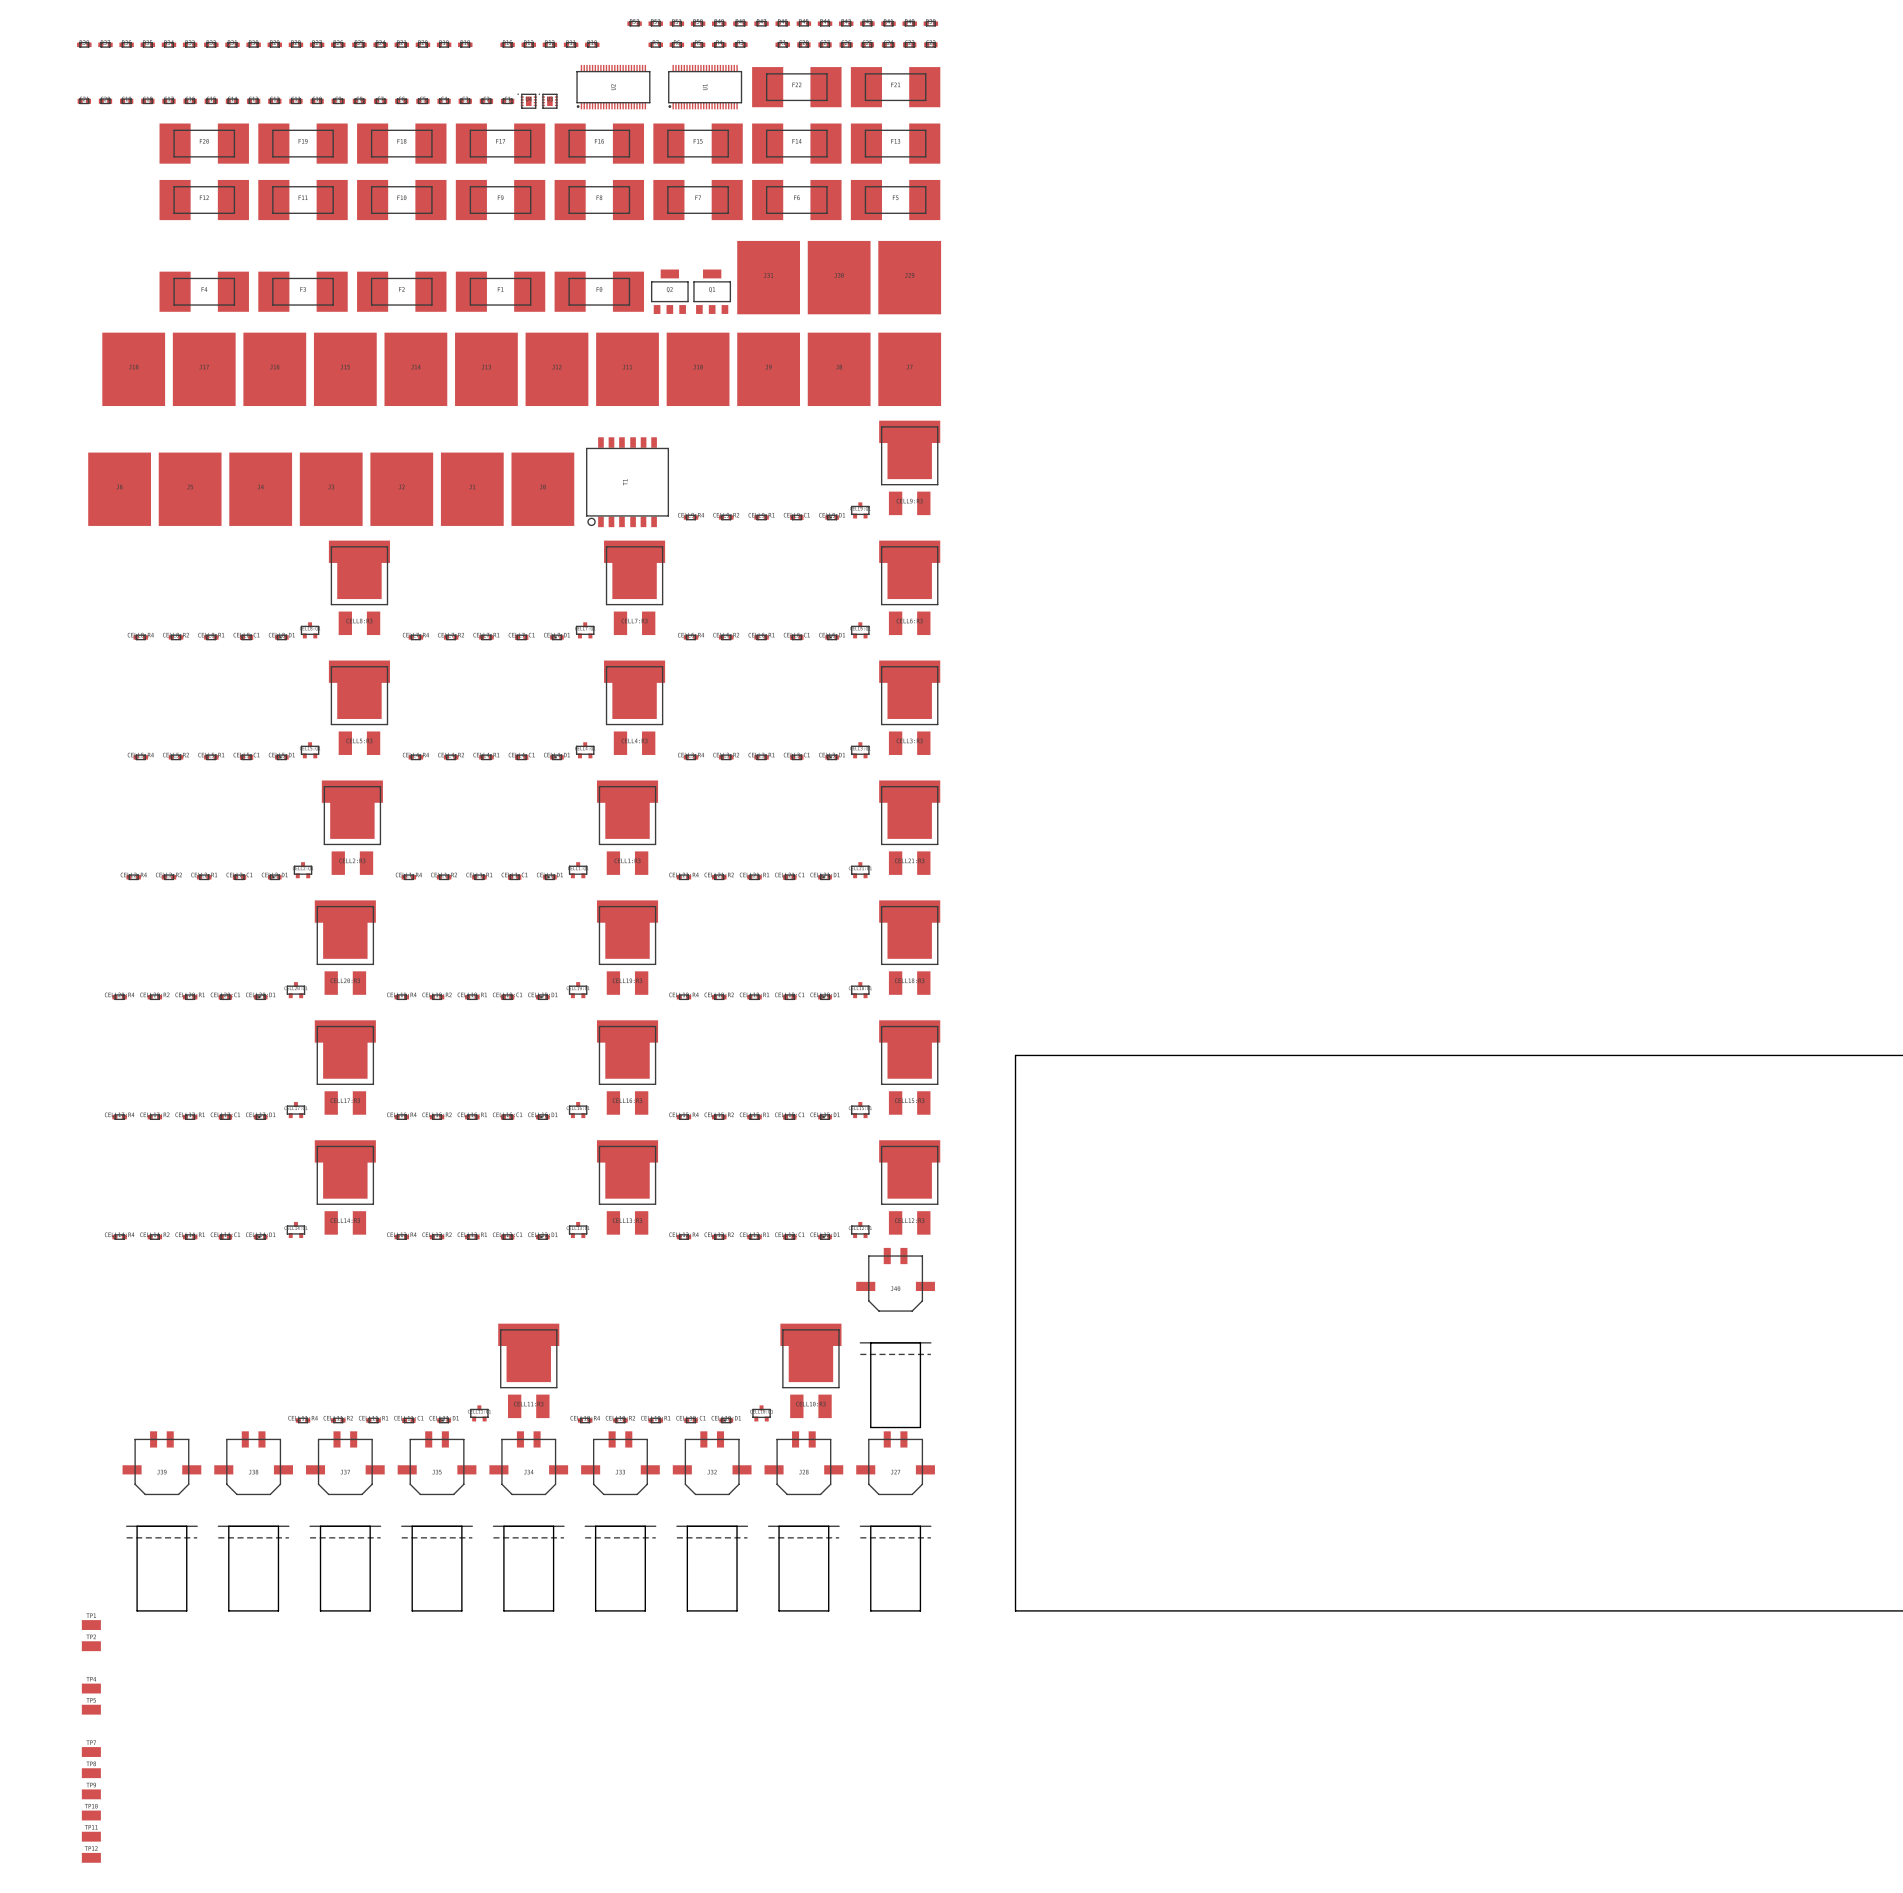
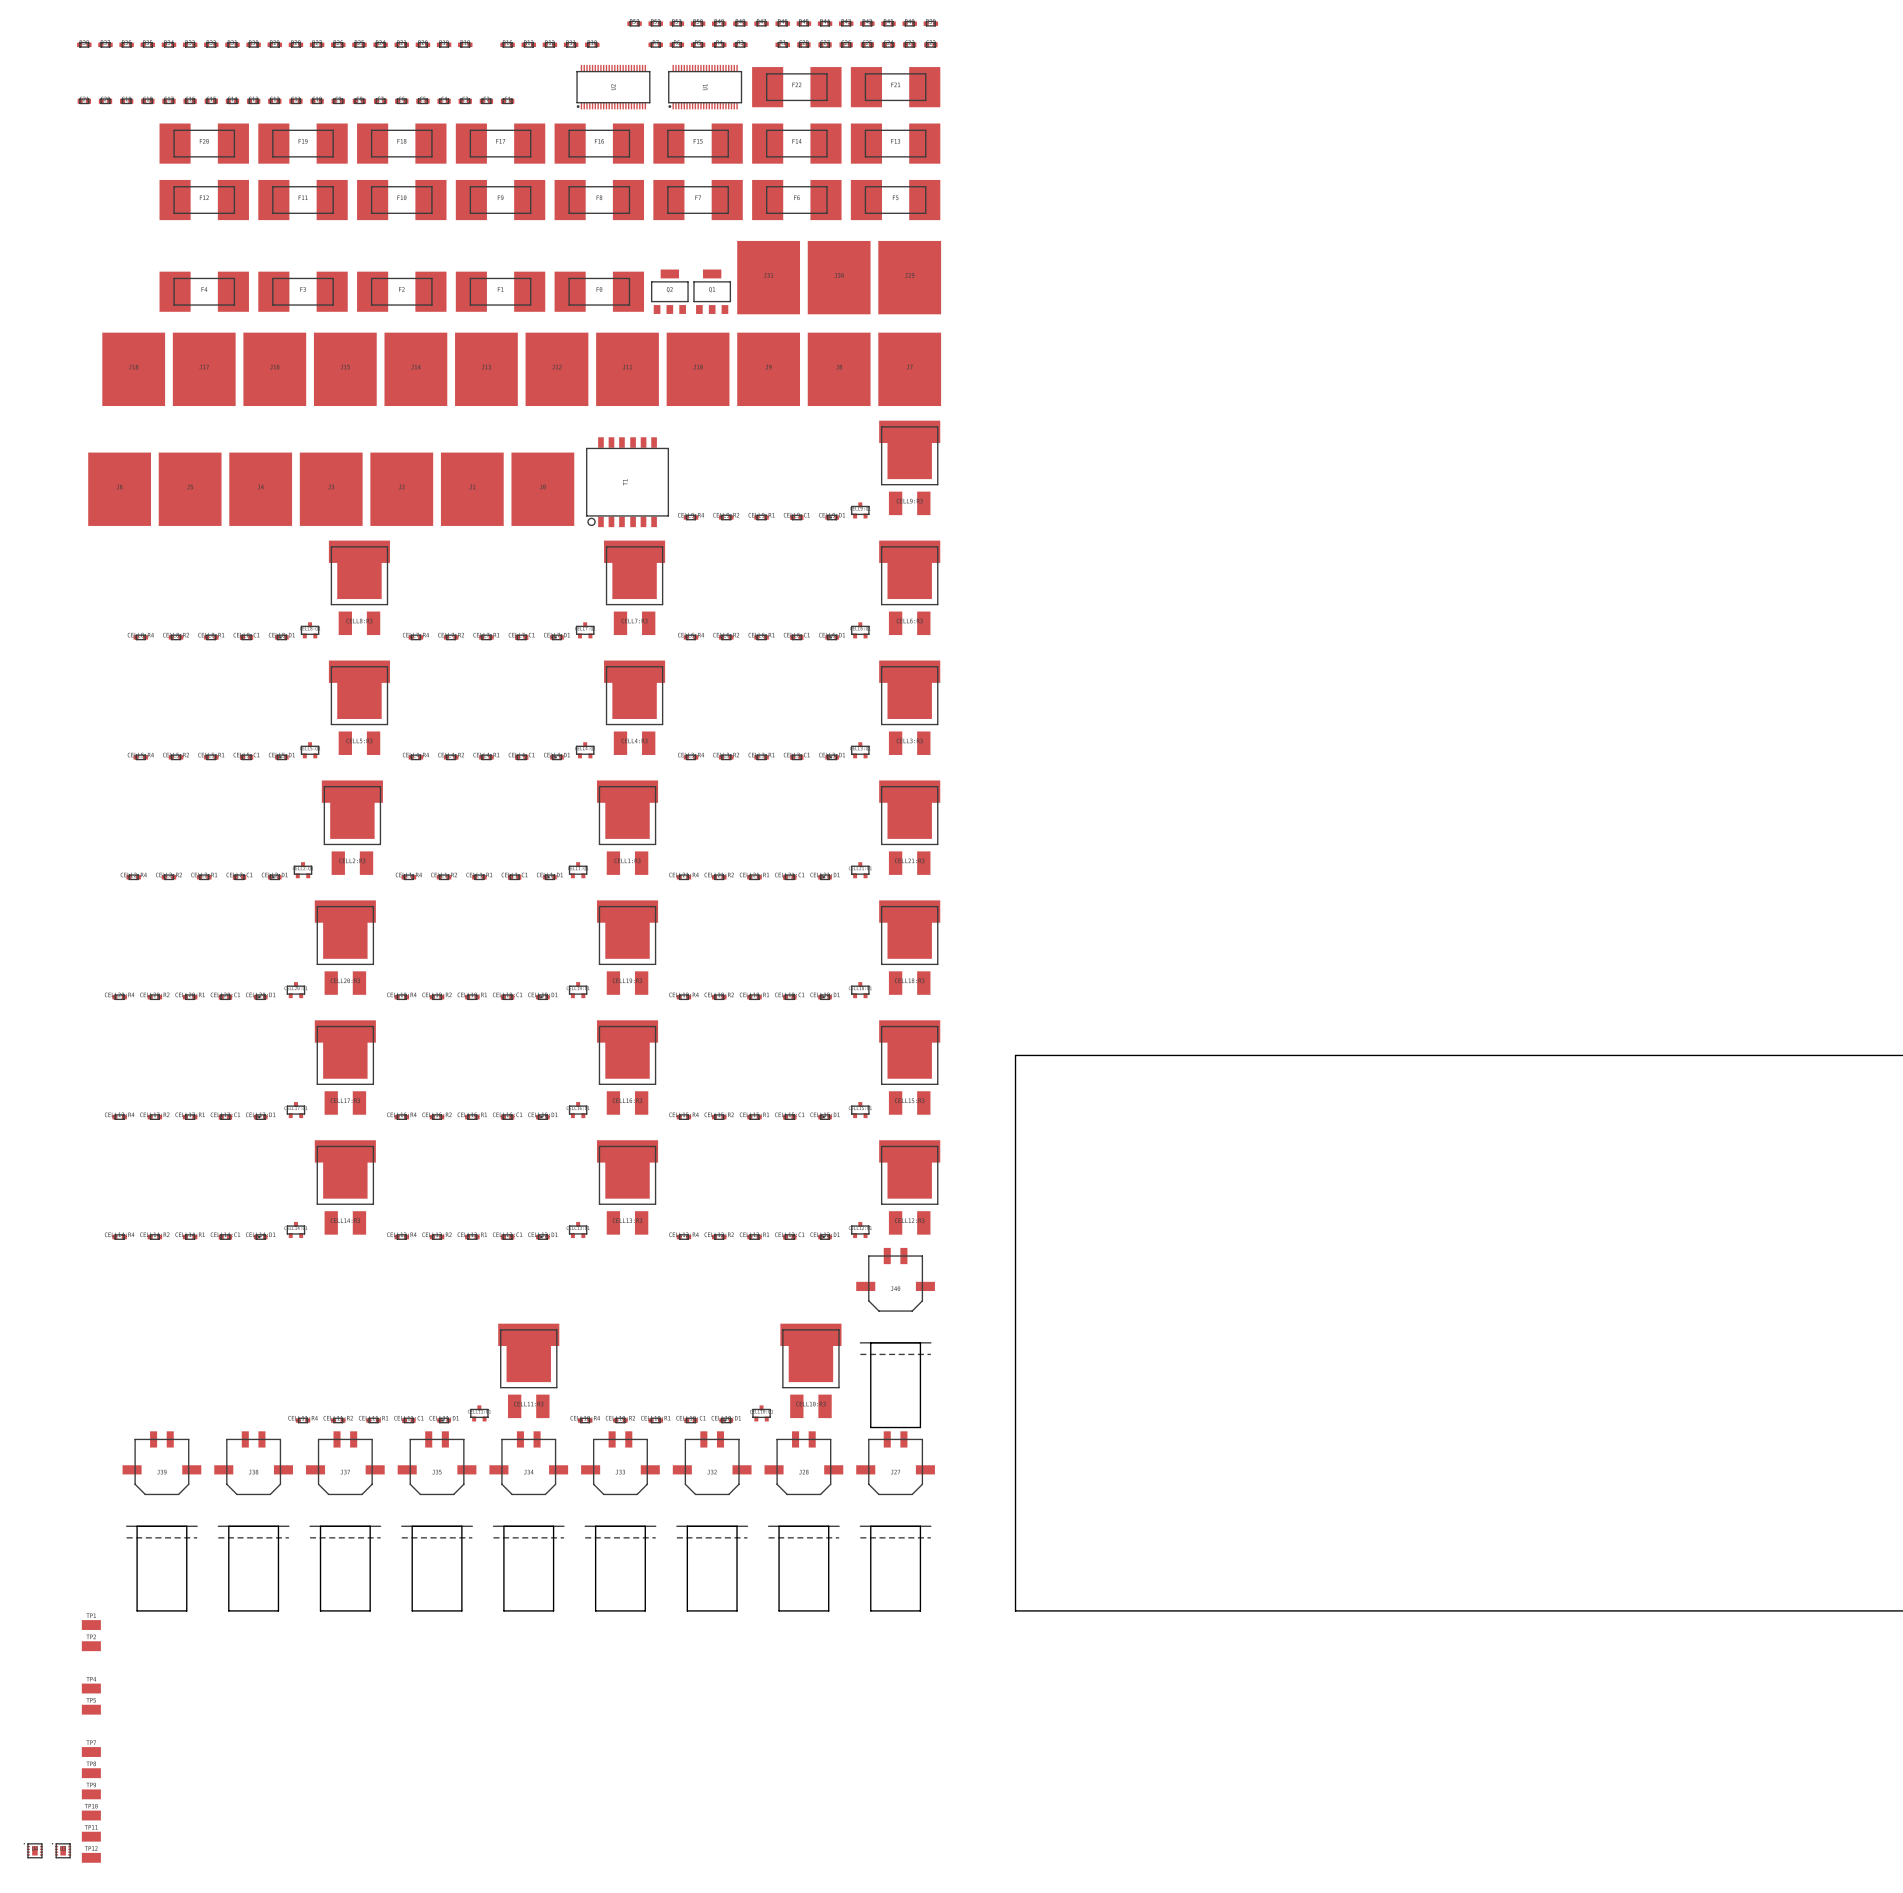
part position: (527, 101) -> (33, 1850)
part position: (548, 101) -> (61, 1850)

